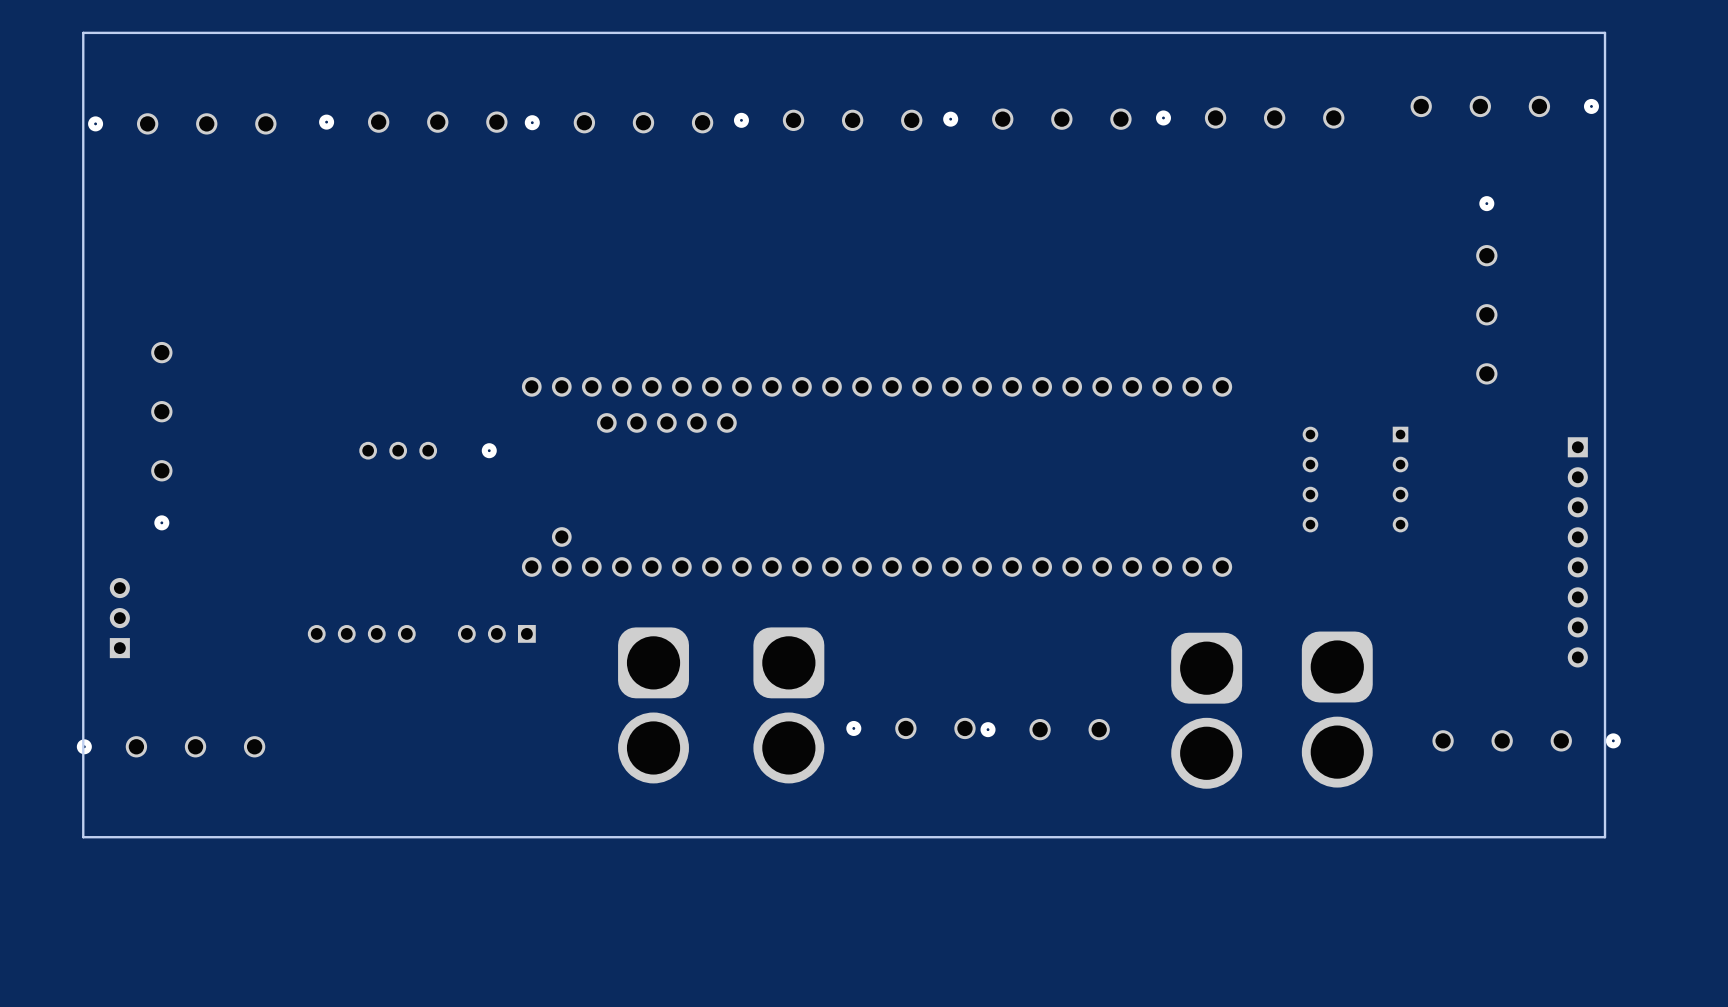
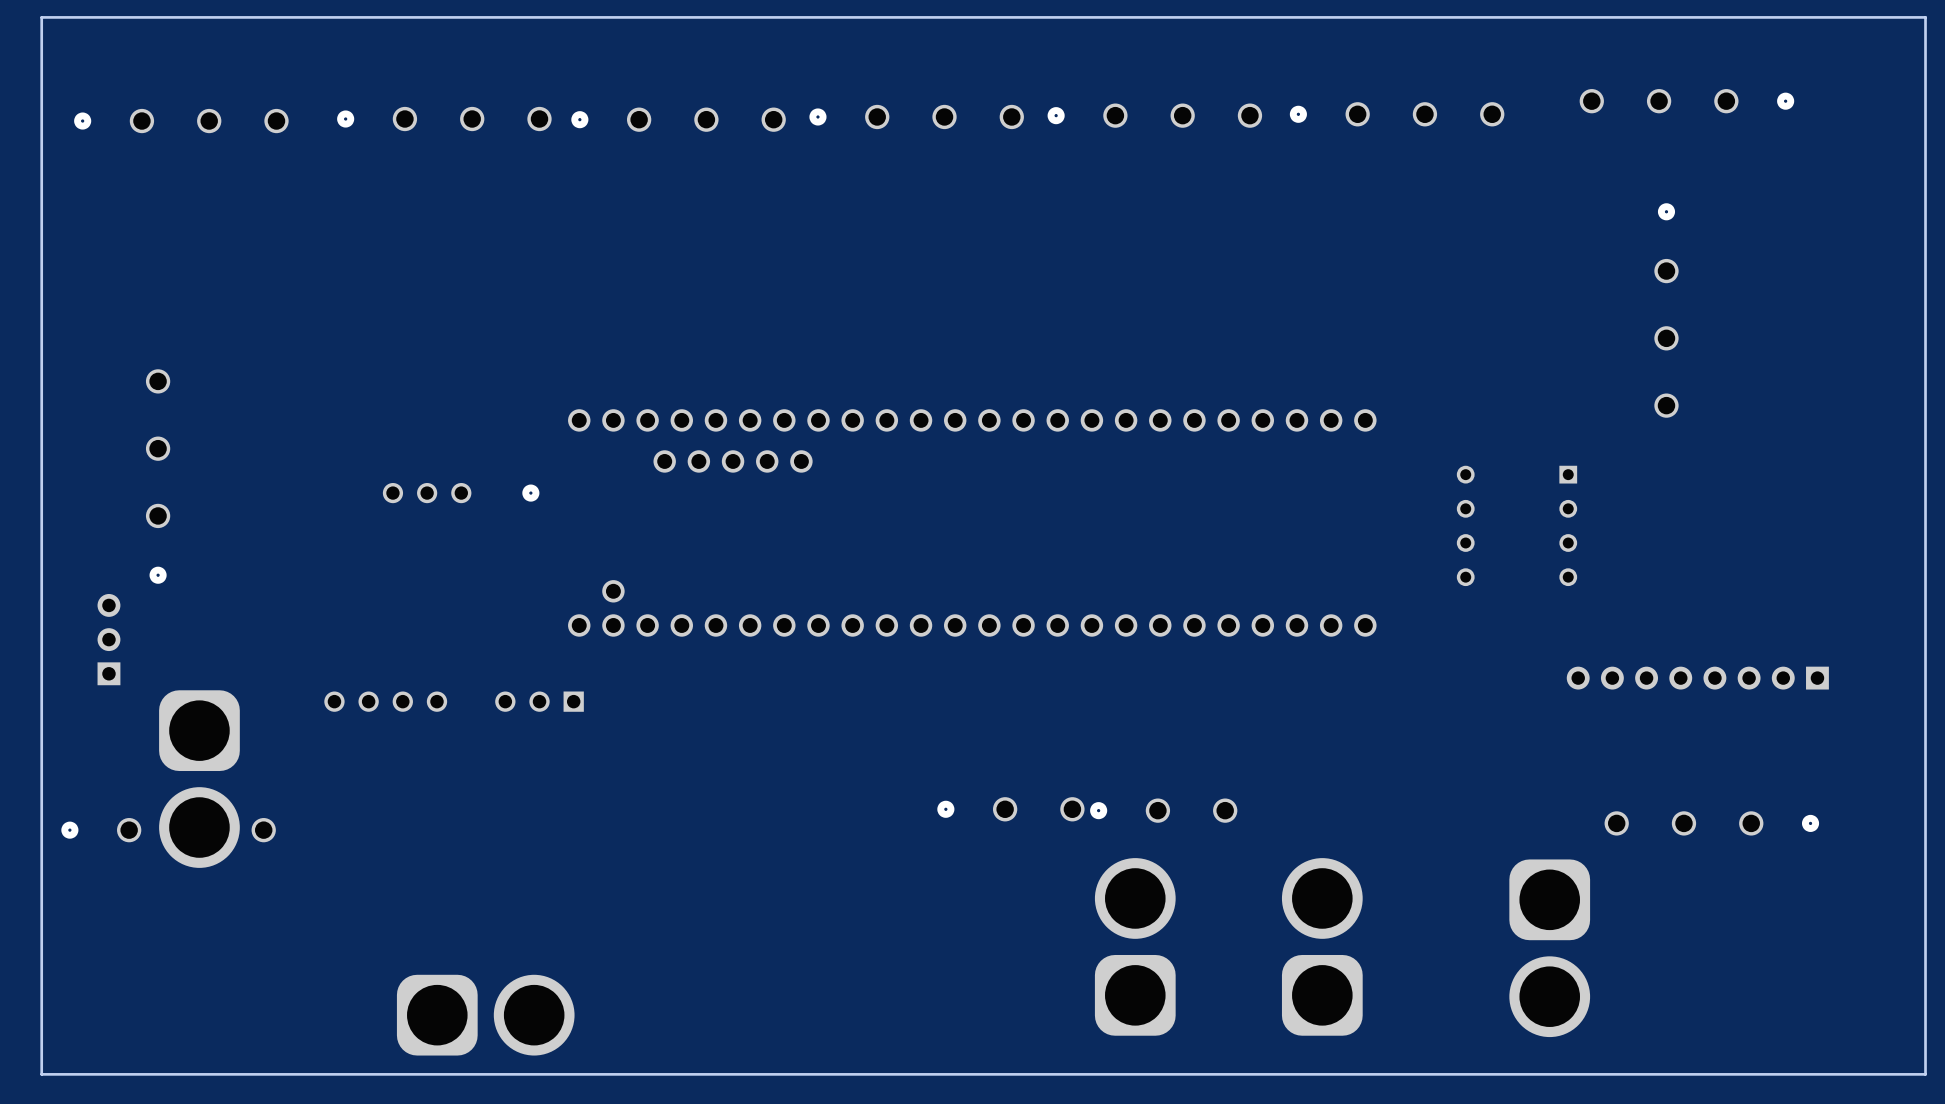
board edge: (1605, 32) (1605, 837) (83, 837) (83, 32) -> (1801, 17) (1925, 17) (1925, 1074) (41, 1074) (41, 17) (68, 17)
part rotation: 0° (1577, 552) -> 90° clockwise (1697, 678)
part position: (119, 618) -> (108, 639)
part: none -> (199, 779)
part: (653, 705) -> none
part: (788, 705) -> none
part: (1337, 709) -> none
part: (1206, 710) -> none
part: none -> (1135, 946)
part: none -> (1322, 946)
part: none -> (1549, 948)
part: none -> (485, 1015)

